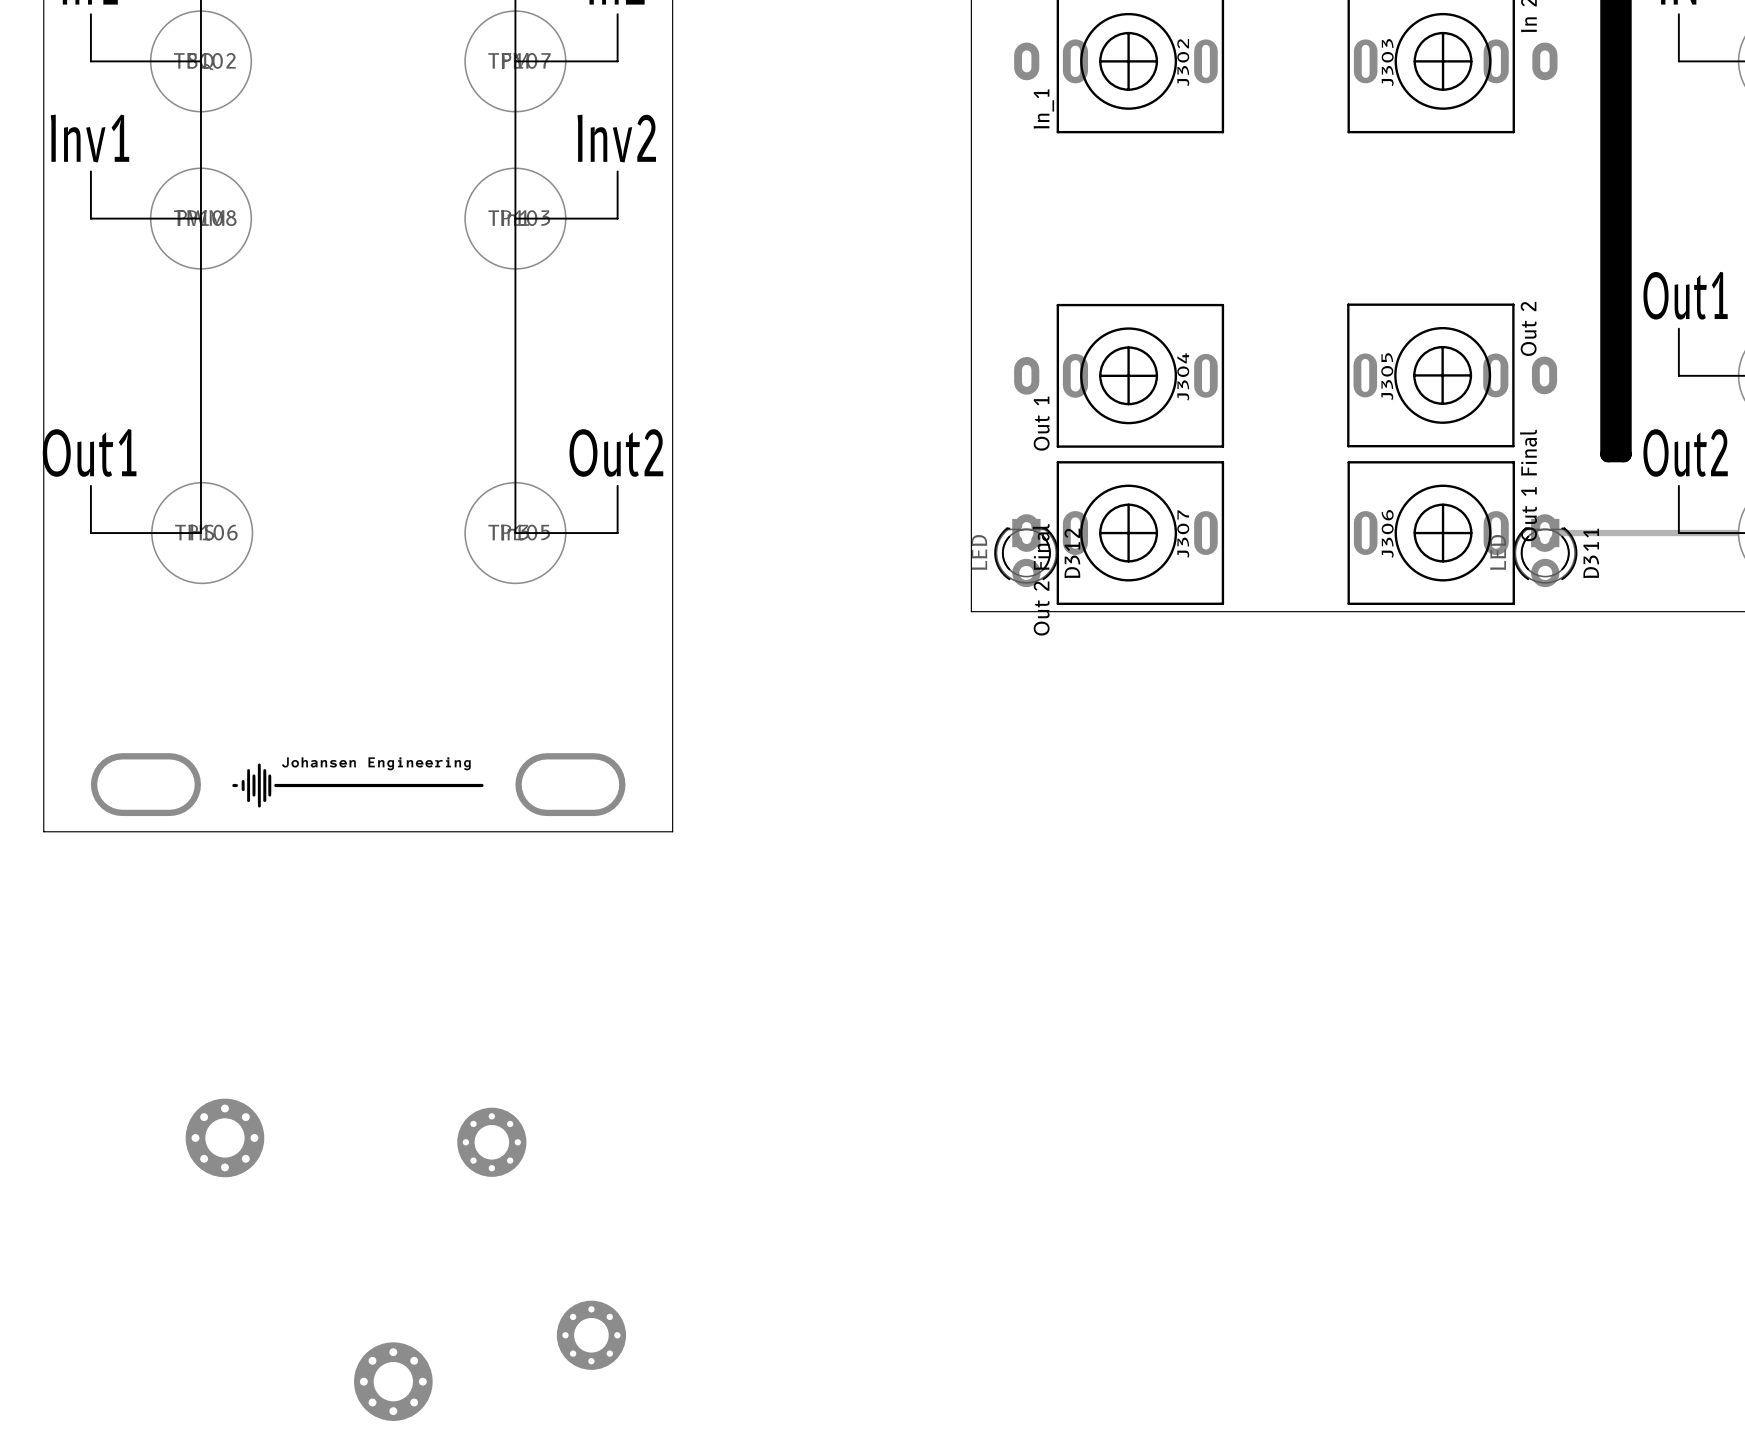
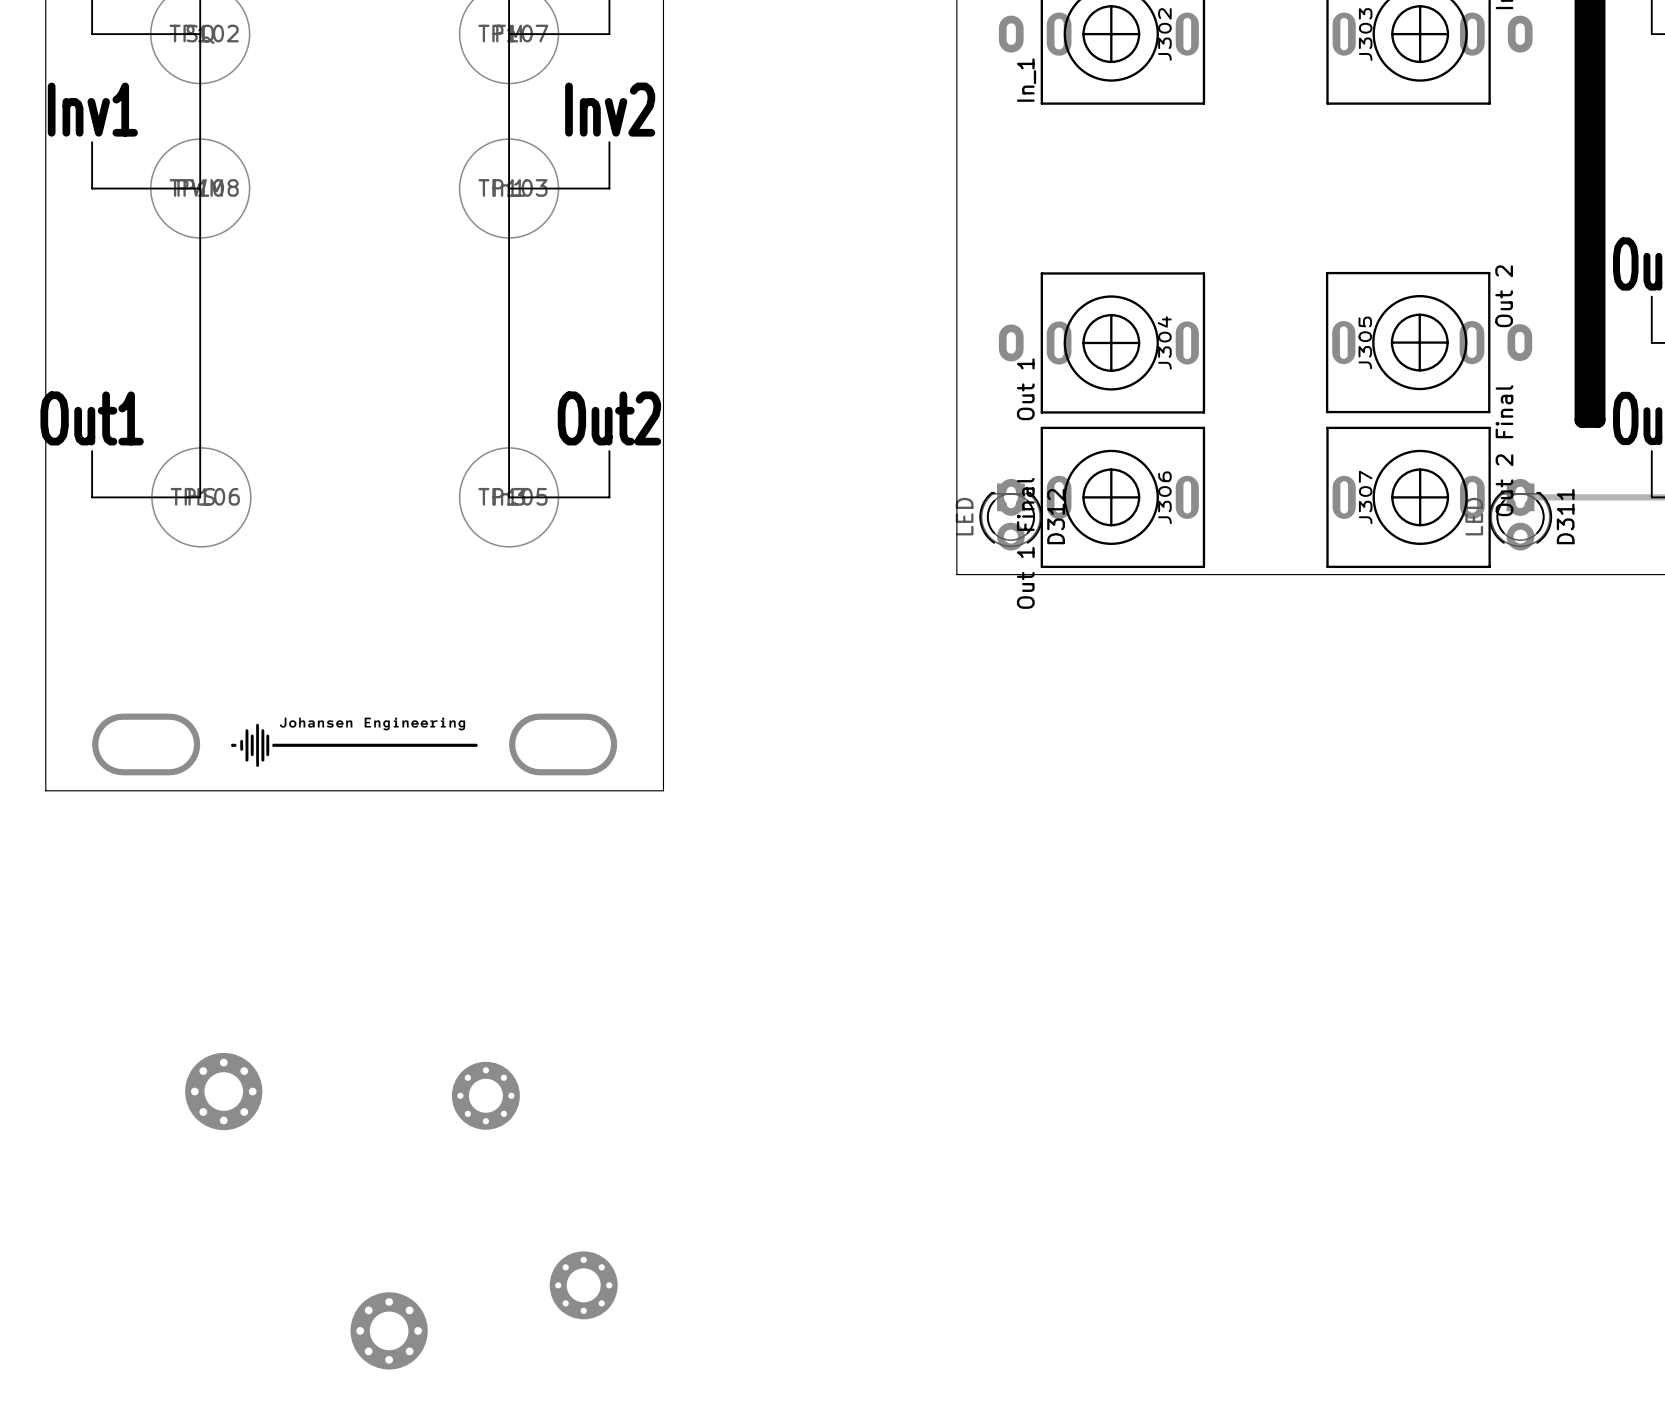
J306 value: Out 1 Final (1528, 485) -> Out 2 Final (1504, 450)
J306 name: J306 (1387, 533) -> J307 (1365, 497)
J307 name: J307 (1183, 534) -> J306 (1164, 497)
J307 value: Out 2 Final (1041, 579) -> Out 1 Final (1025, 543)

